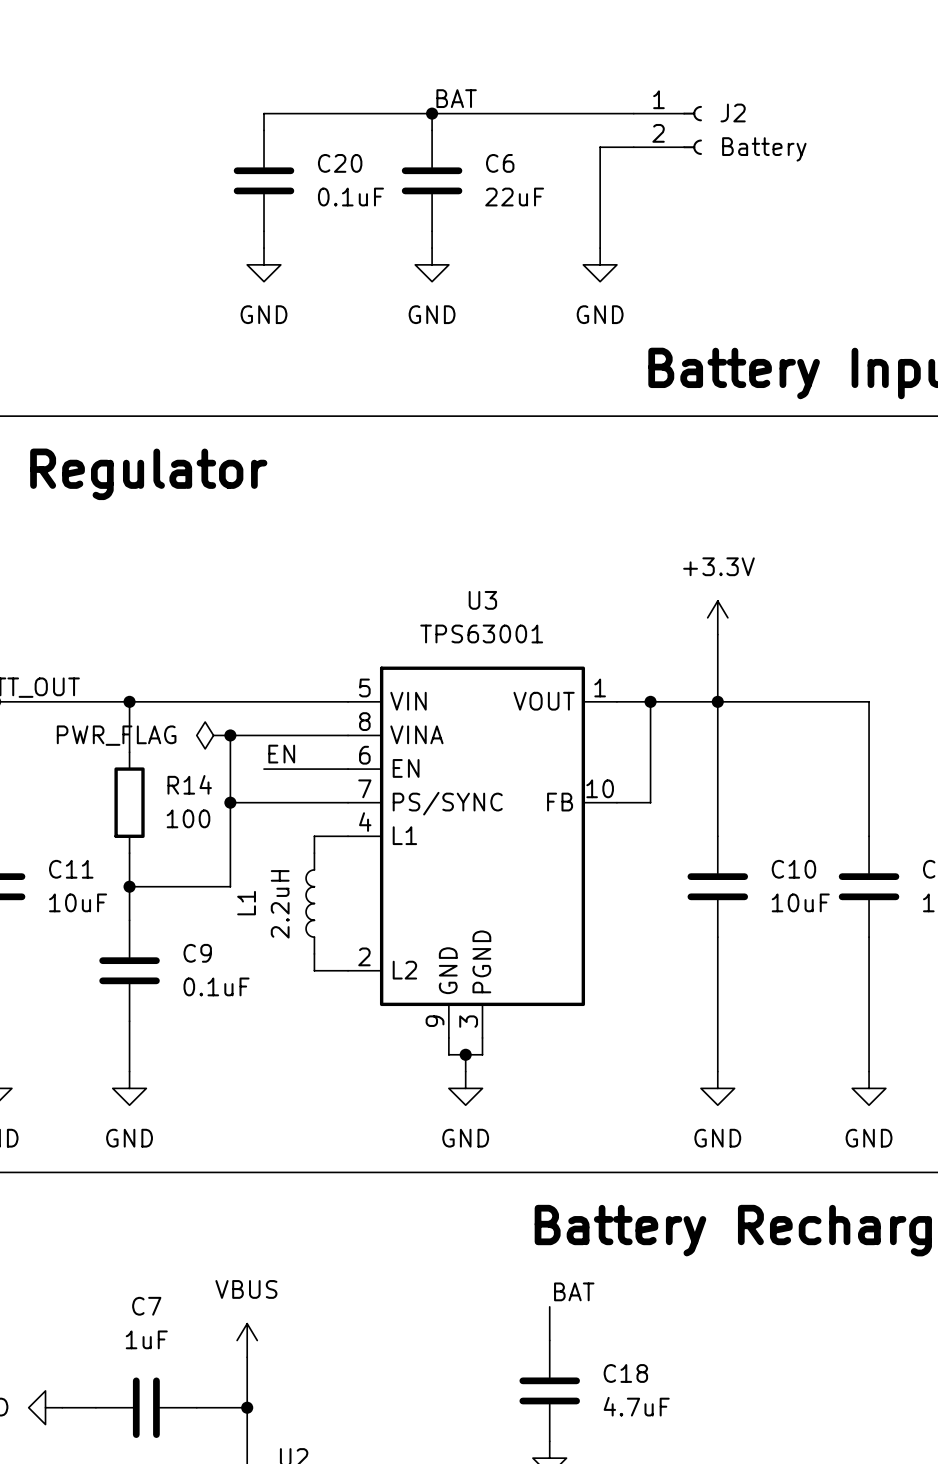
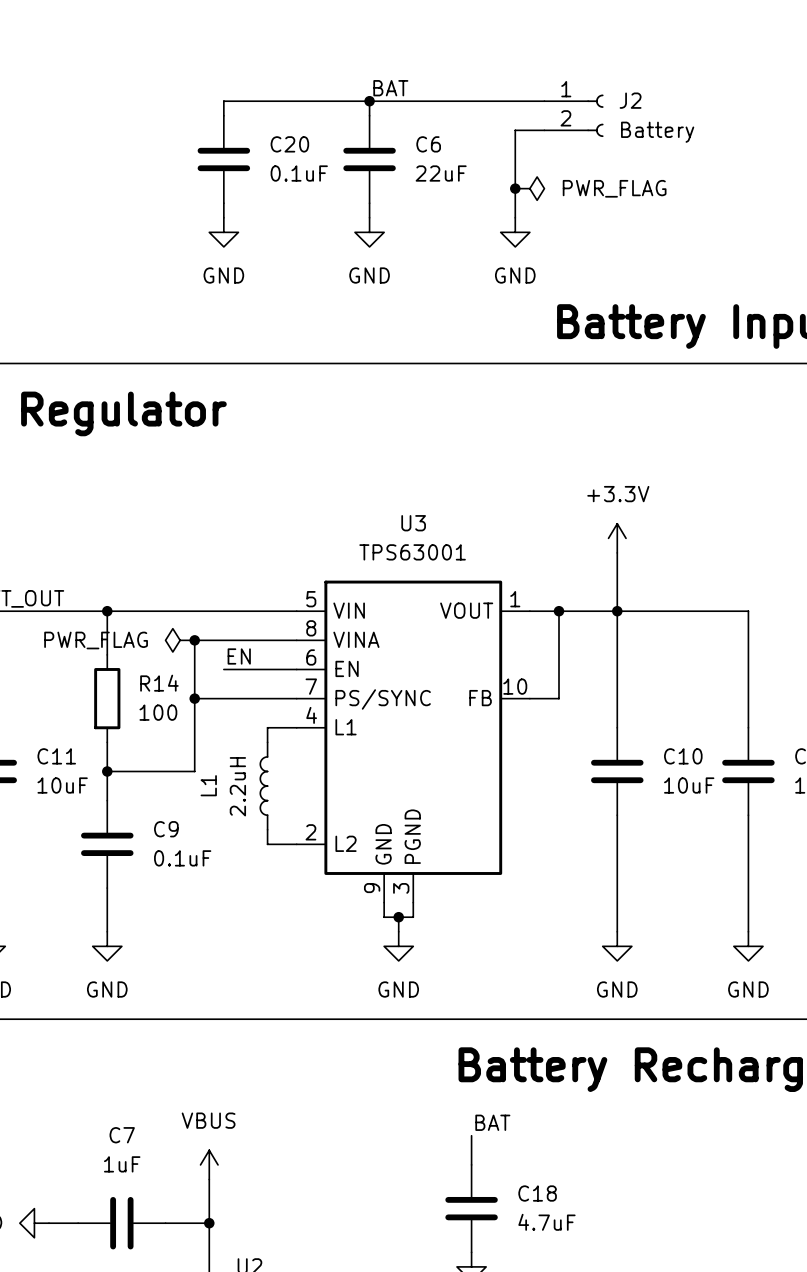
junction: none -> (515, 188)
power symbol: none -> PWR_FLAG (529, 188)

